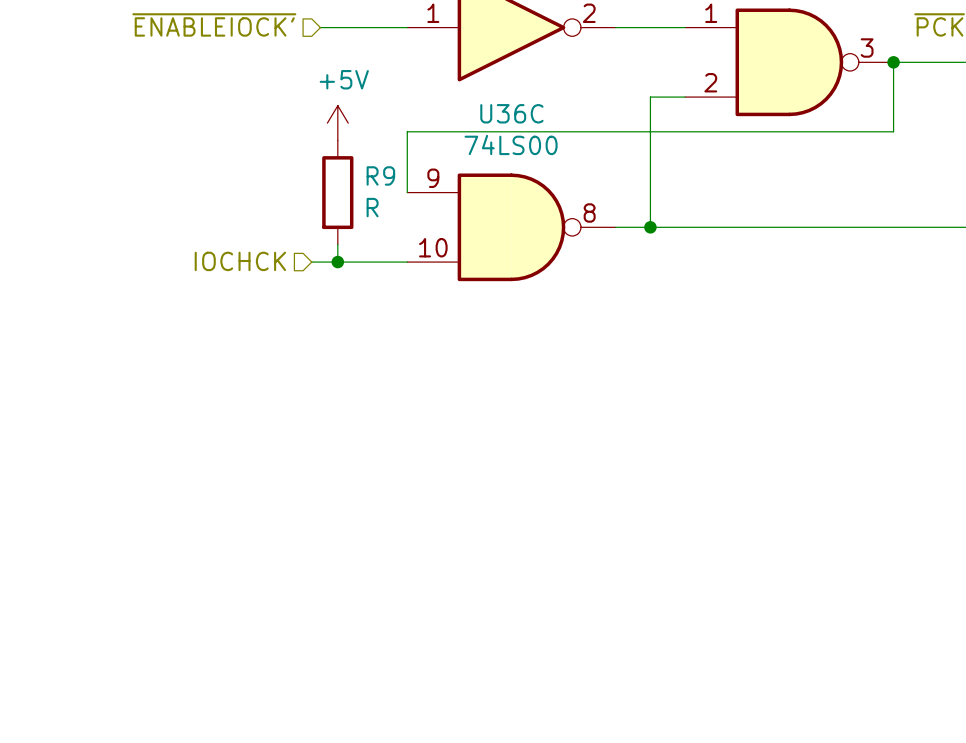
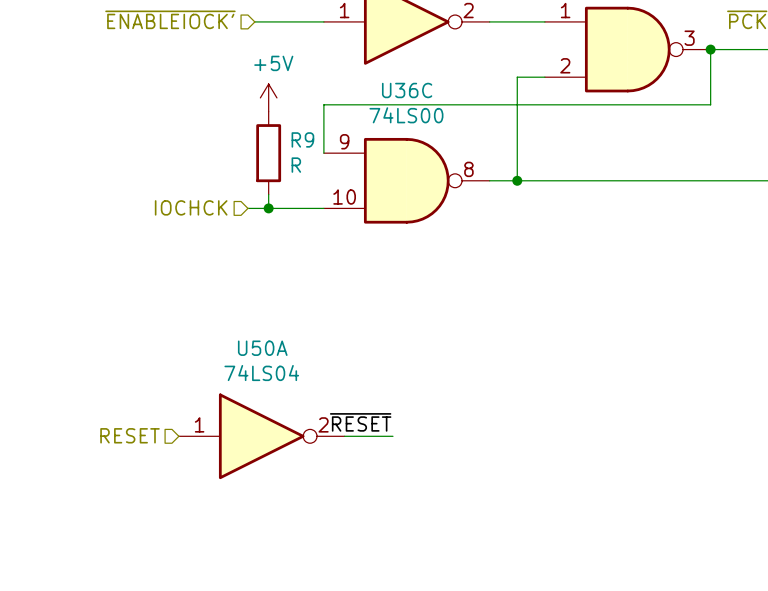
label: none -> ~{RESET} (360, 422)
hierarchical label: none -> RESET (130, 435)
U50A: none -> 74LS04 (261, 436)
wire: none -> (344, 436) (392, 436)

